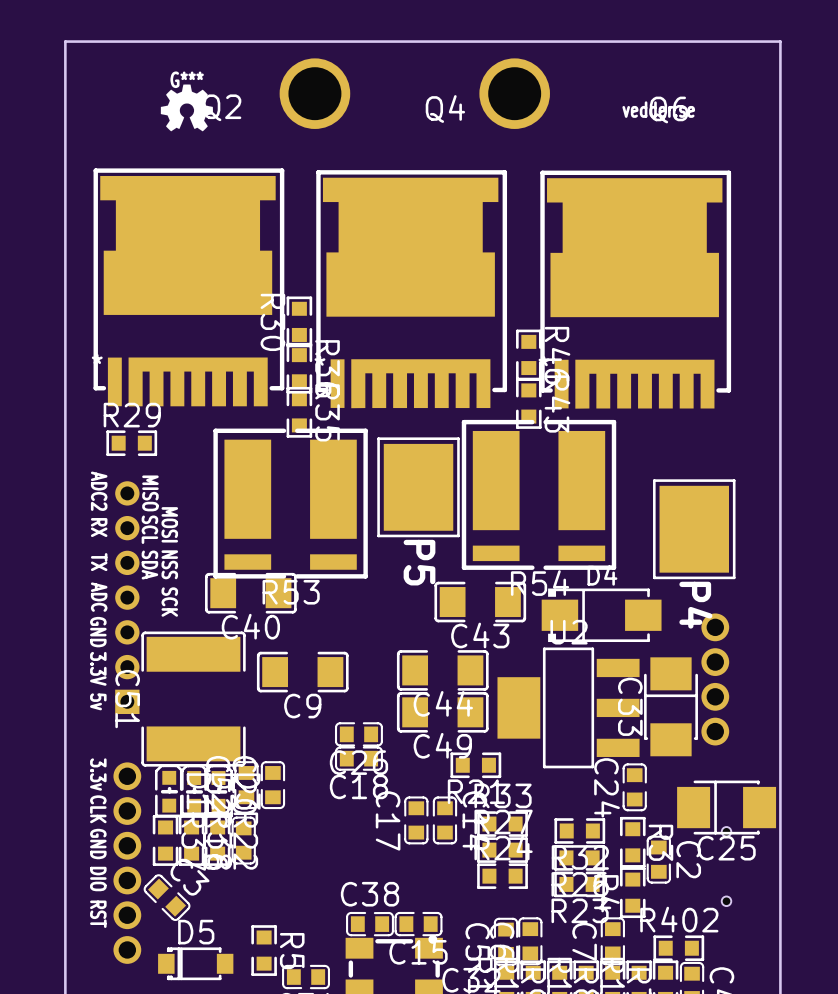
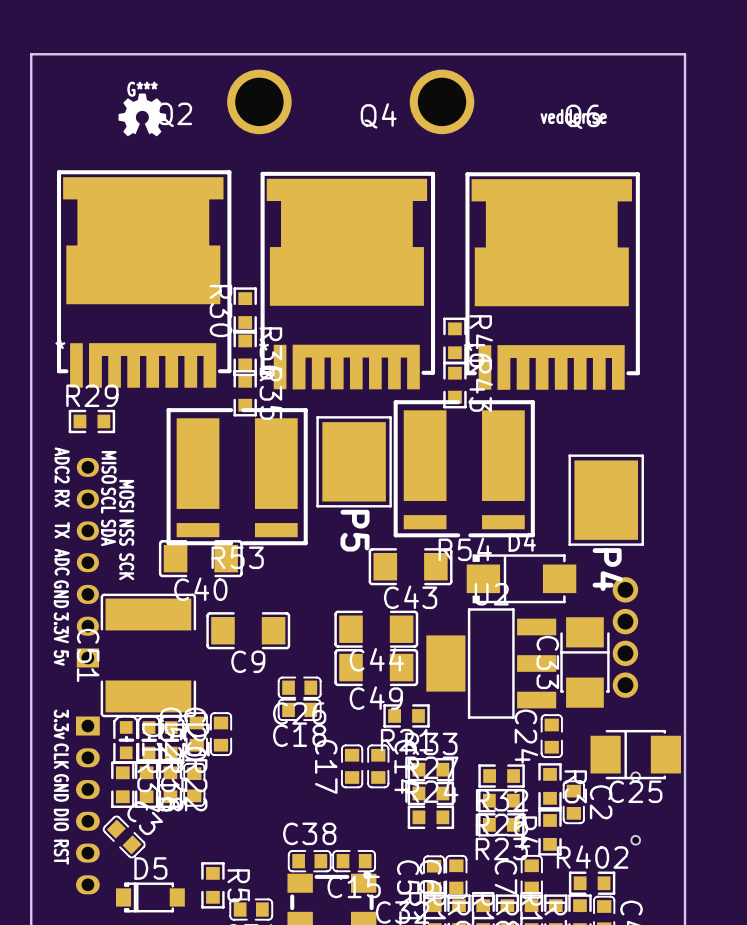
part footprint: [115, 481, 140, 714] -> [76, 457, 100, 668]
part footprint: [113, 762, 142, 964] -> [75, 716, 100, 895]

